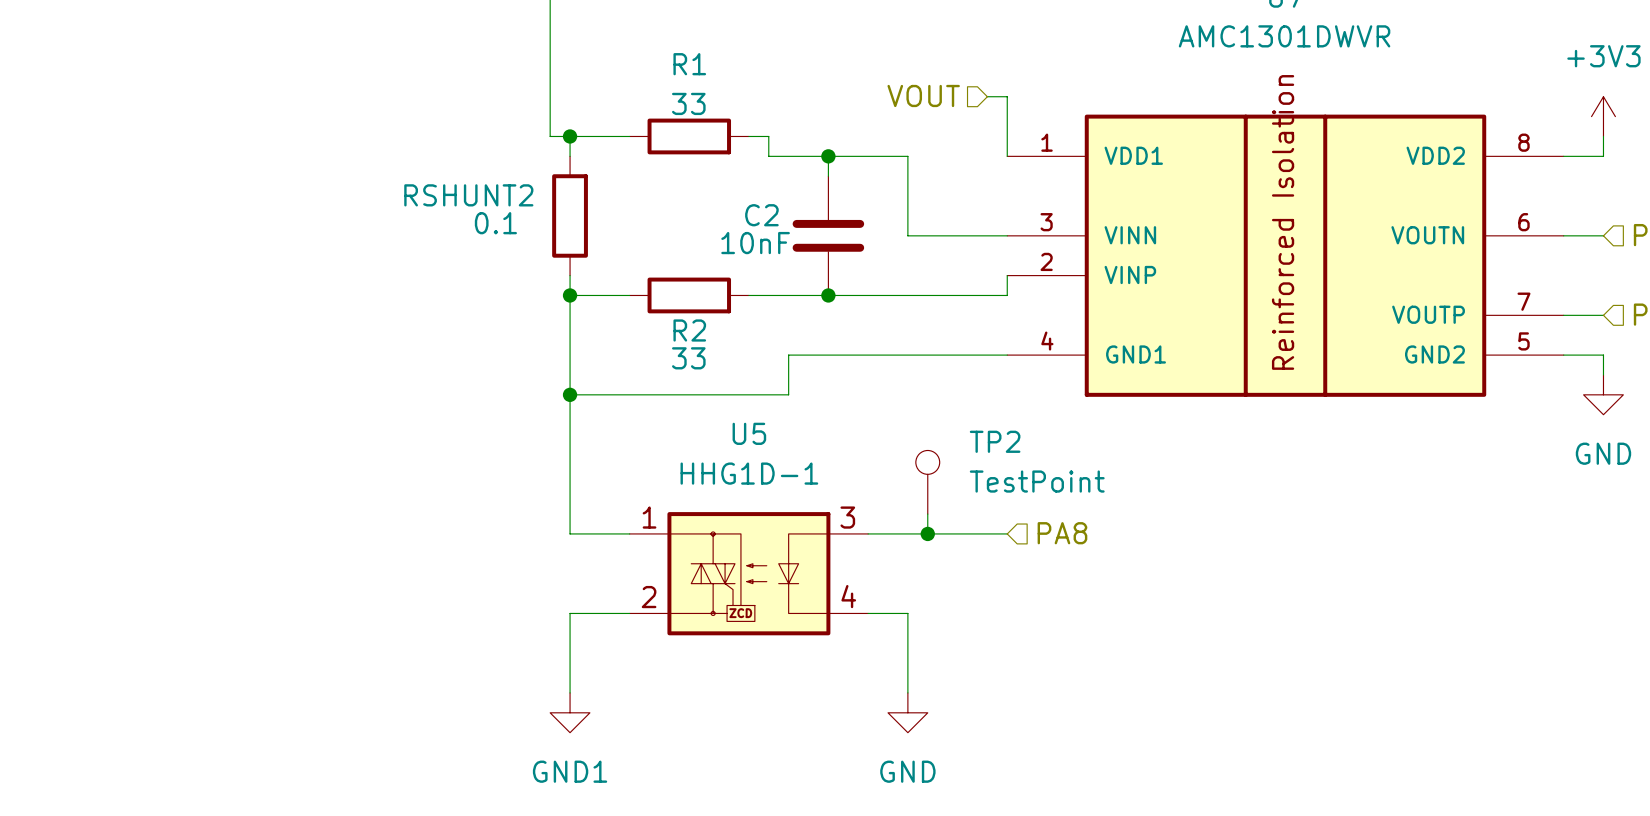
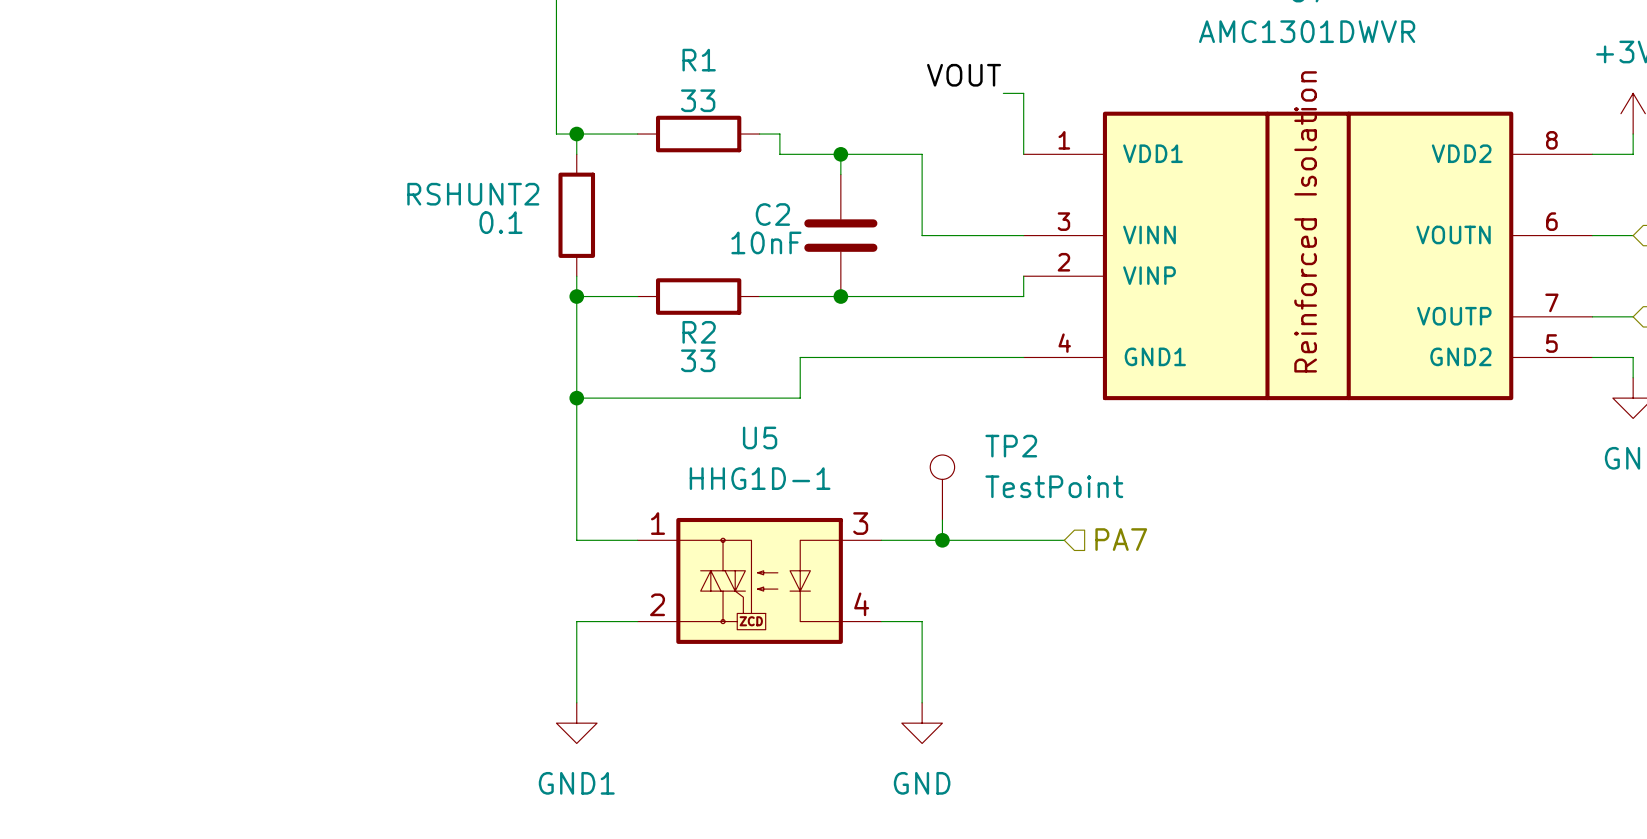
label: none -> VOUT (964, 75)
hierarchical label: VOUT (923, 95) -> none
wire: none -> (1023, 540) (1064, 540)
hierarchical label: PA8 (1062, 533) -> PA7 (1121, 539)

